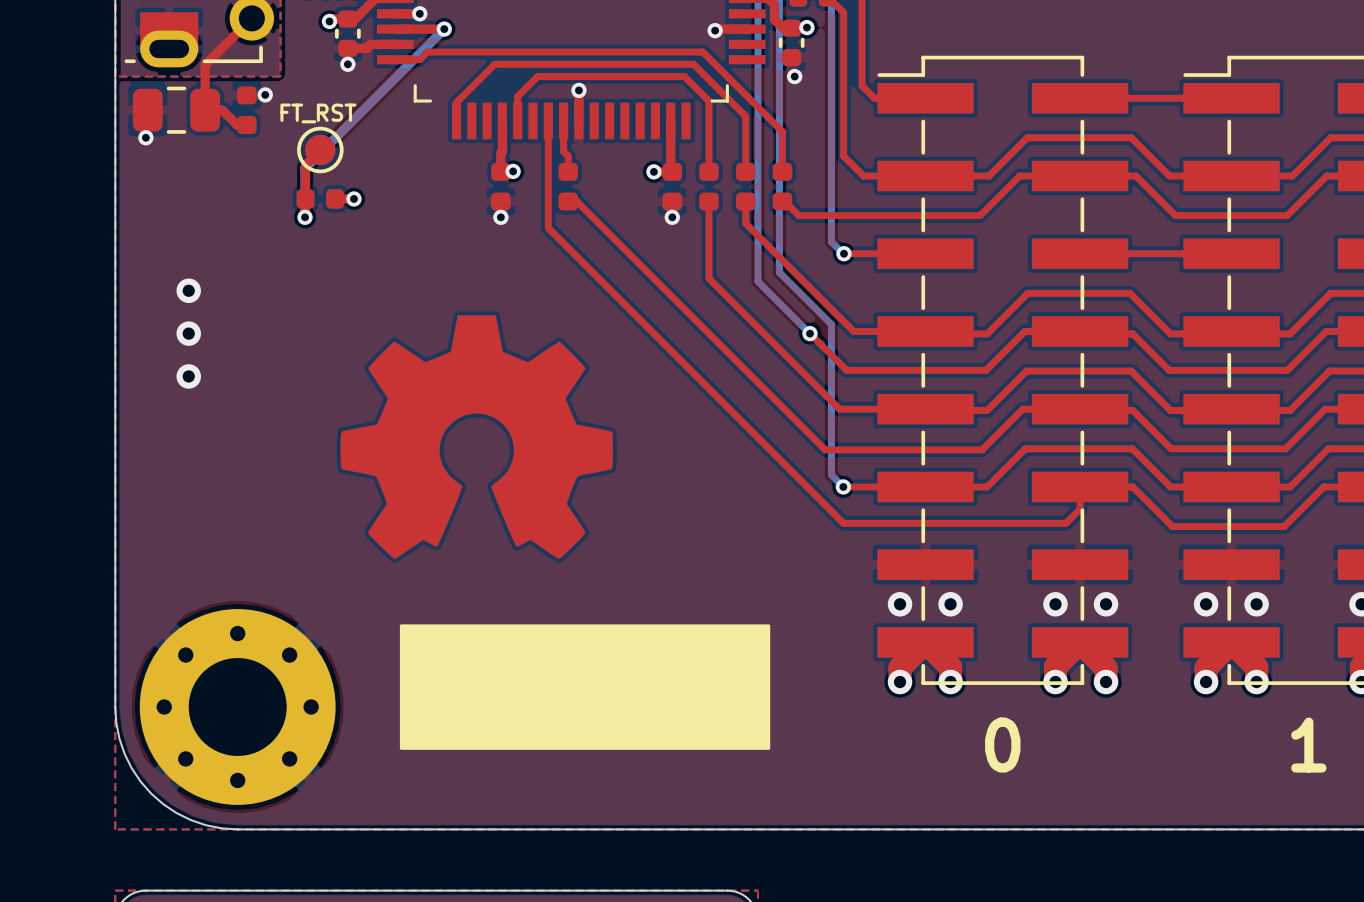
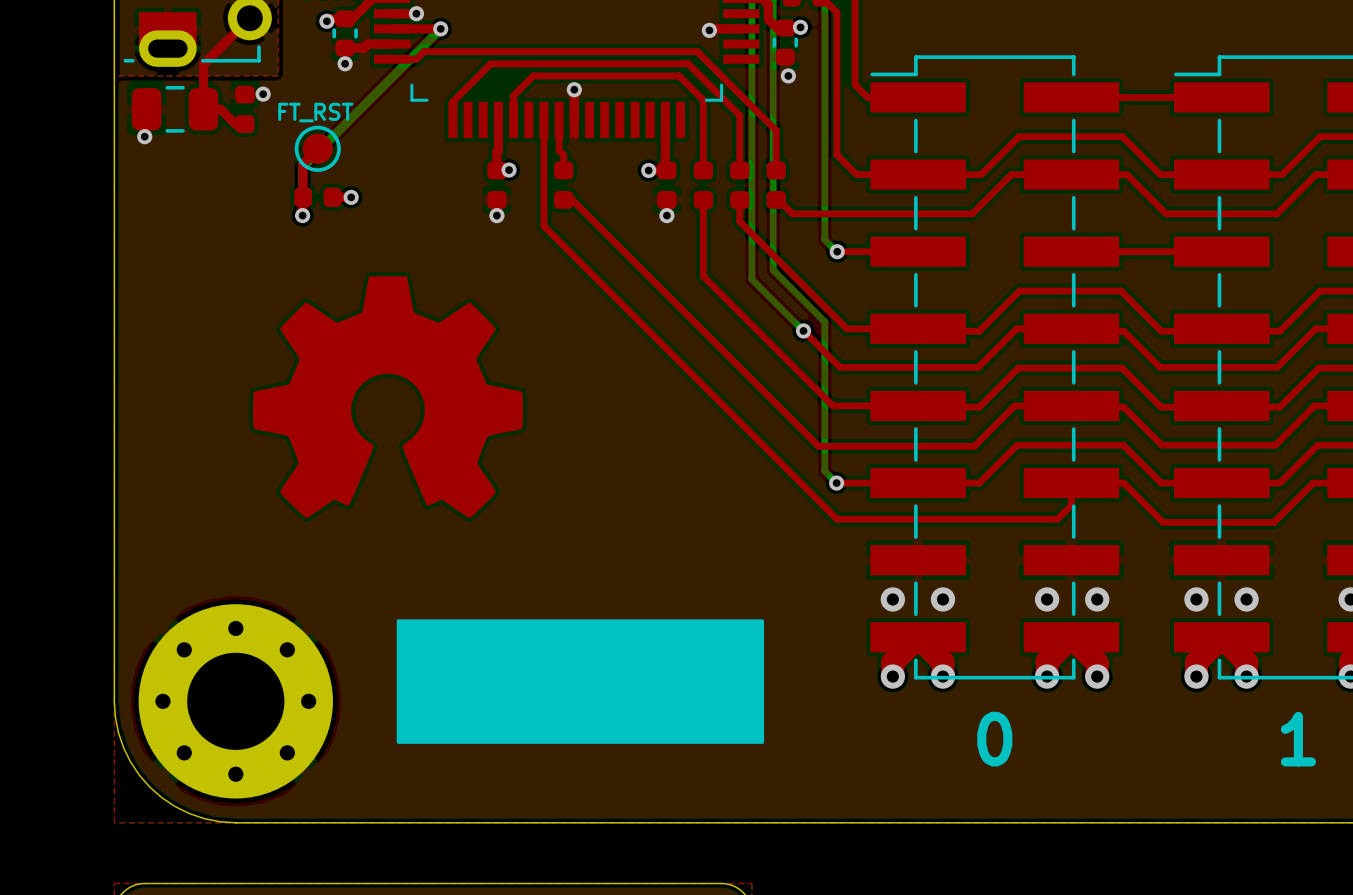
via: (188, 290) -> none
via: (188, 333) -> none
via: (188, 376) -> none
drawing position: (476, 437) -> (387, 397)

